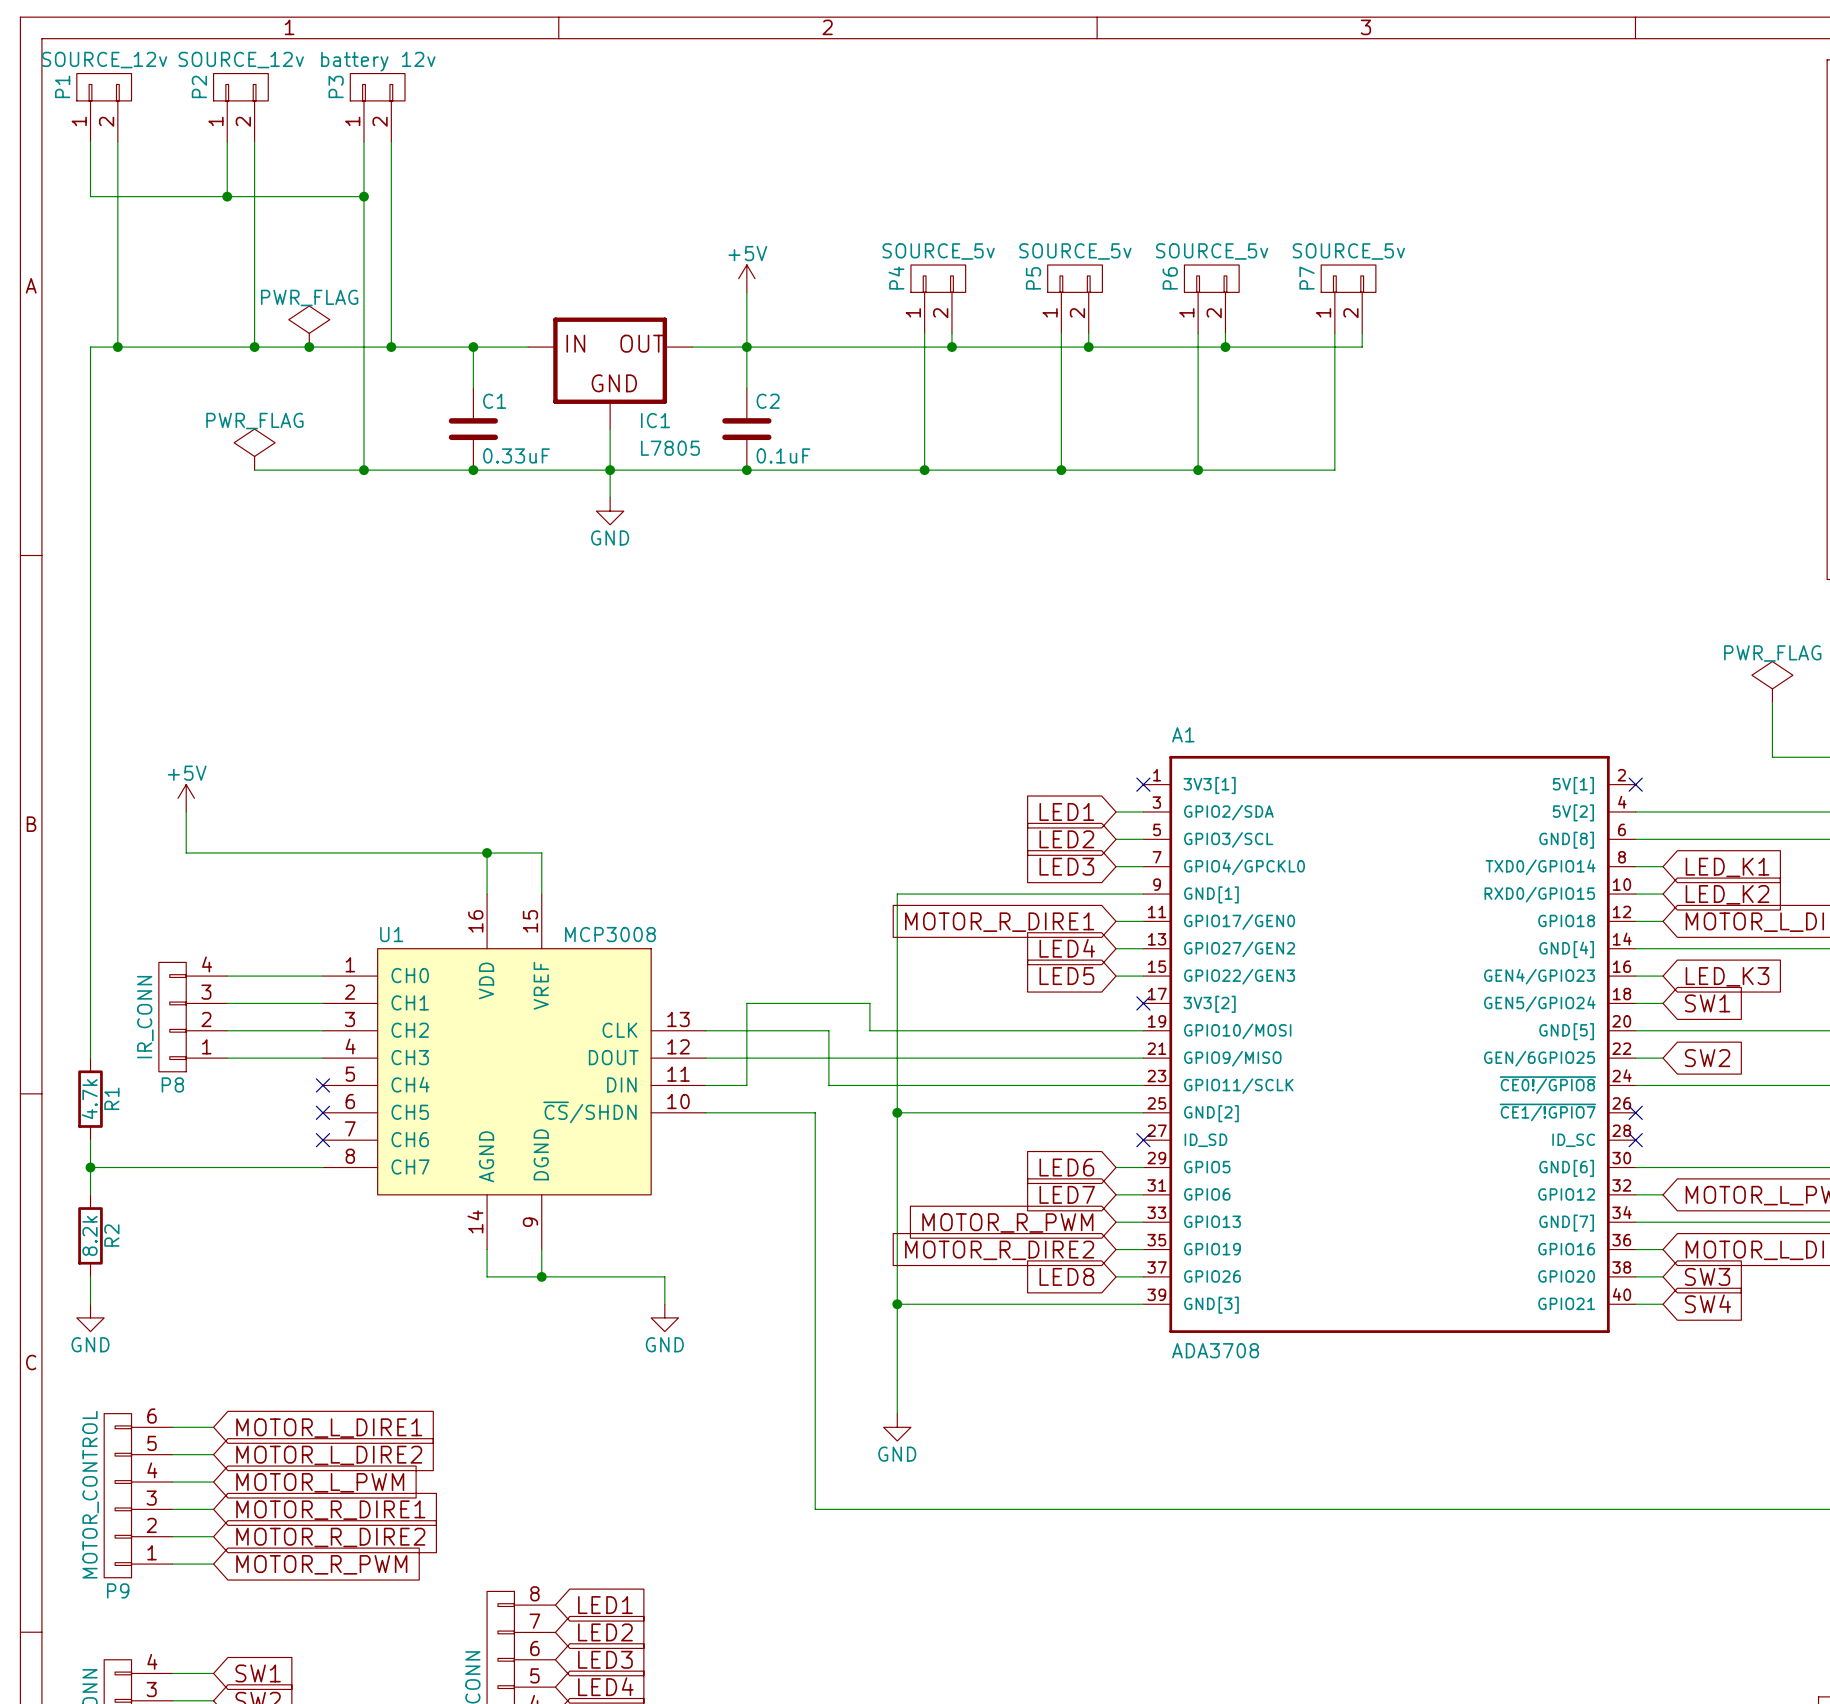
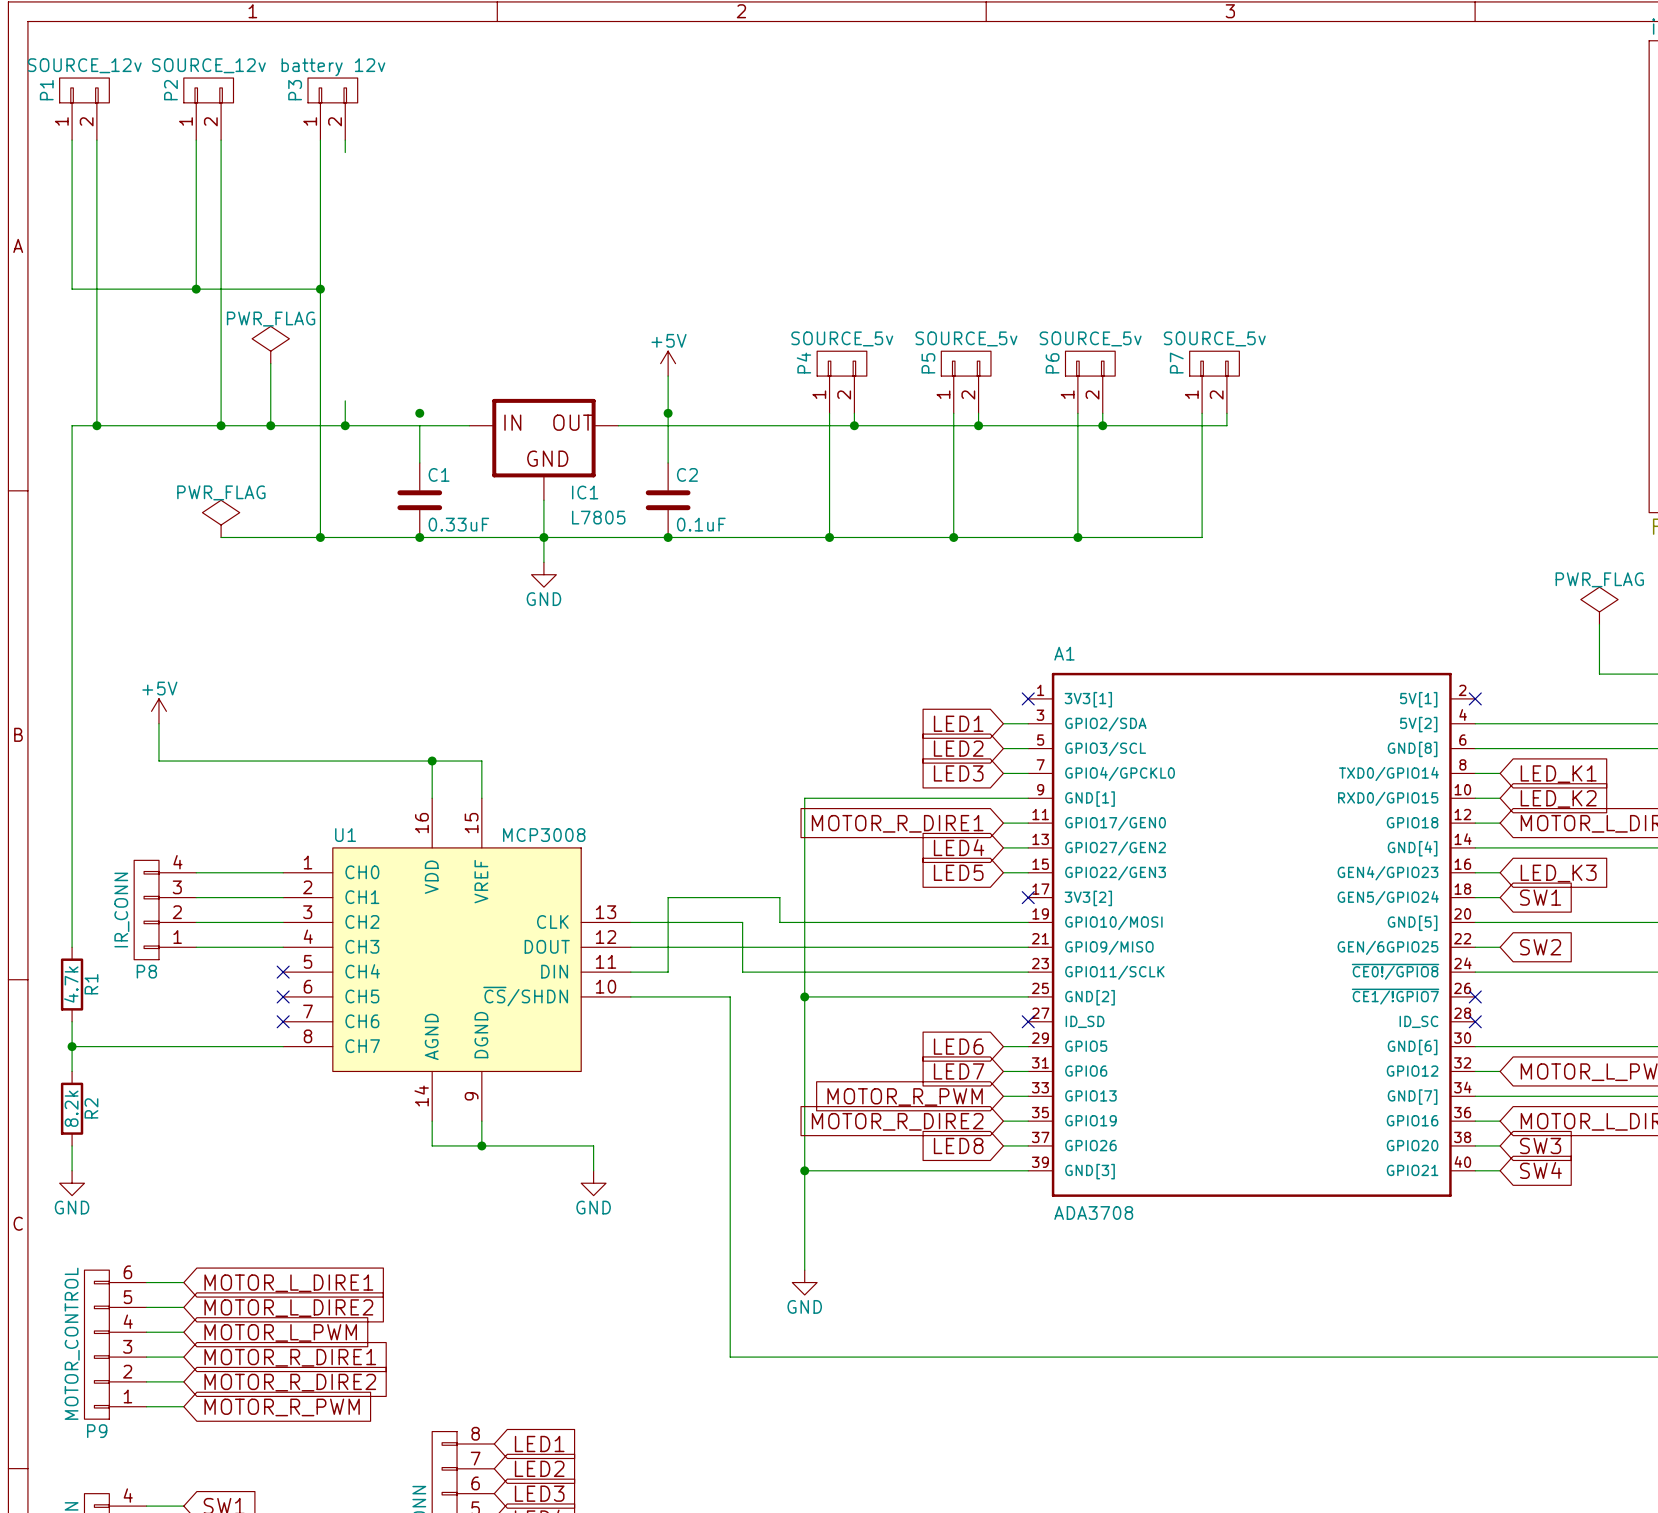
P1 position: (104, 107) -> (84, 109)
P2 position: (240, 107) -> (208, 109)
P3 position: (377, 107) -> (332, 109)
wire: (391, 182) (391, 347) -> none
wire: (90, 196) (363, 196) -> (72, 164) (72, 289) (320, 289)
wire: none -> (196, 164) (196, 289)
junction: (227, 196) -> none
junction: (363, 196) -> none
power symbol position: +5V (746, 278) -> +5V (668, 363)
wire: (746, 292) (746, 388) -> (668, 376) (668, 462)
P4 position: (938, 299) -> (841, 382)
P5 position: (1075, 299) -> (966, 382)
P6 position: (1211, 299) -> (1090, 382)
P7 position: (1348, 299) -> (1214, 382)
power symbol: PWR_FLAG (309, 326) -> none
junction: none -> (320, 289)
wire: (924, 333) (924, 470) -> (829, 537) (829, 413)
wire: (951, 333) (951, 347) -> (854, 413) (854, 425)
wire: (1061, 333) (1061, 470) -> (953, 537) (953, 413)
wire: (1088, 333) (1088, 347) -> (978, 413) (978, 425)
wire: (1198, 333) (1198, 470) -> (1077, 537) (1077, 413)
wire: (1225, 333) (1225, 347) -> (1102, 413) (1102, 425)
wire: (1334, 333) (1334, 470) (254, 470) -> (1202, 413) (1202, 537) (221, 537)
wire: (1362, 333) (1362, 347) (692, 347) -> (1226, 413) (1226, 425) (618, 425)
wire: none -> (96, 301) (96, 425)
junction: (117, 347) -> none
wire: none -> (221, 301) (221, 425)
junction position: (254, 347) -> (196, 289)
junction: (309, 347) -> none
junction: (391, 347) -> none
wire: (473, 347) (473, 388) -> (419, 425) (419, 462)
junction: (473, 347) -> none
wire: (528, 347) (90, 347) (90, 483) -> (469, 425) (72, 425)
junction: (746, 347) -> none
junction: (951, 347) -> none
junction: (1088, 347) -> none
junction: (1225, 347) -> none
IC1 position: (610, 373) -> (543, 449)
power symbol: none -> PWR_FLAG (270, 345)
wire: none -> (270, 363) (270, 425)
C1 position: (473, 429) -> (419, 500)
wire: (610, 429) (610, 497) -> (543, 500) (543, 562)
C2 position: (746, 429) -> (668, 500)
power symbol: PWR_FLAG (254, 449) -> none
wire: none -> (345, 400) (345, 425)
wire: none -> (320, 413) (320, 537)
junction: (363, 470) -> none
junction: (610, 470) -> none
junction position: (924, 470) -> (854, 425)
junction position: (1061, 470) -> (978, 425)
junction position: (1198, 470) -> (1102, 425)
junction: none -> (96, 425)
junction: none -> (221, 425)
junction: none -> (270, 425)
junction: none -> (345, 425)
power symbol position: GND (610, 511) -> GND (543, 574)
power symbol: none -> PWR_FLAG (221, 518)
junction: none -> (320, 537)
junction: none -> (419, 537)
junction: none -> (543, 537)
junction: none -> (668, 537)
junction: none -> (829, 537)
junction: none -> (953, 537)
junction: none -> (1077, 537)

